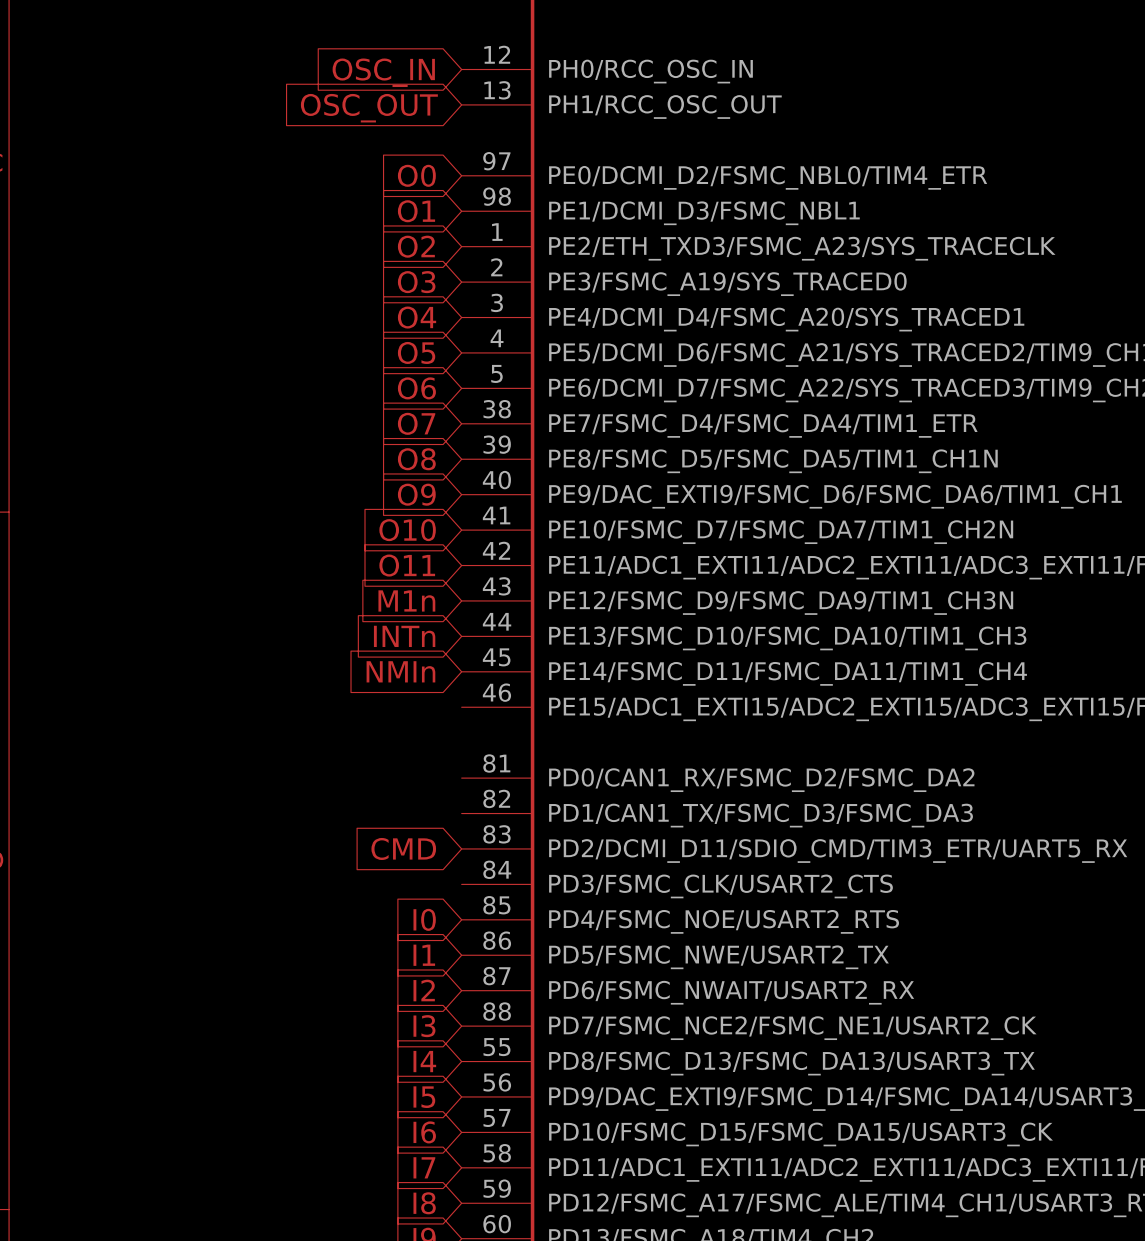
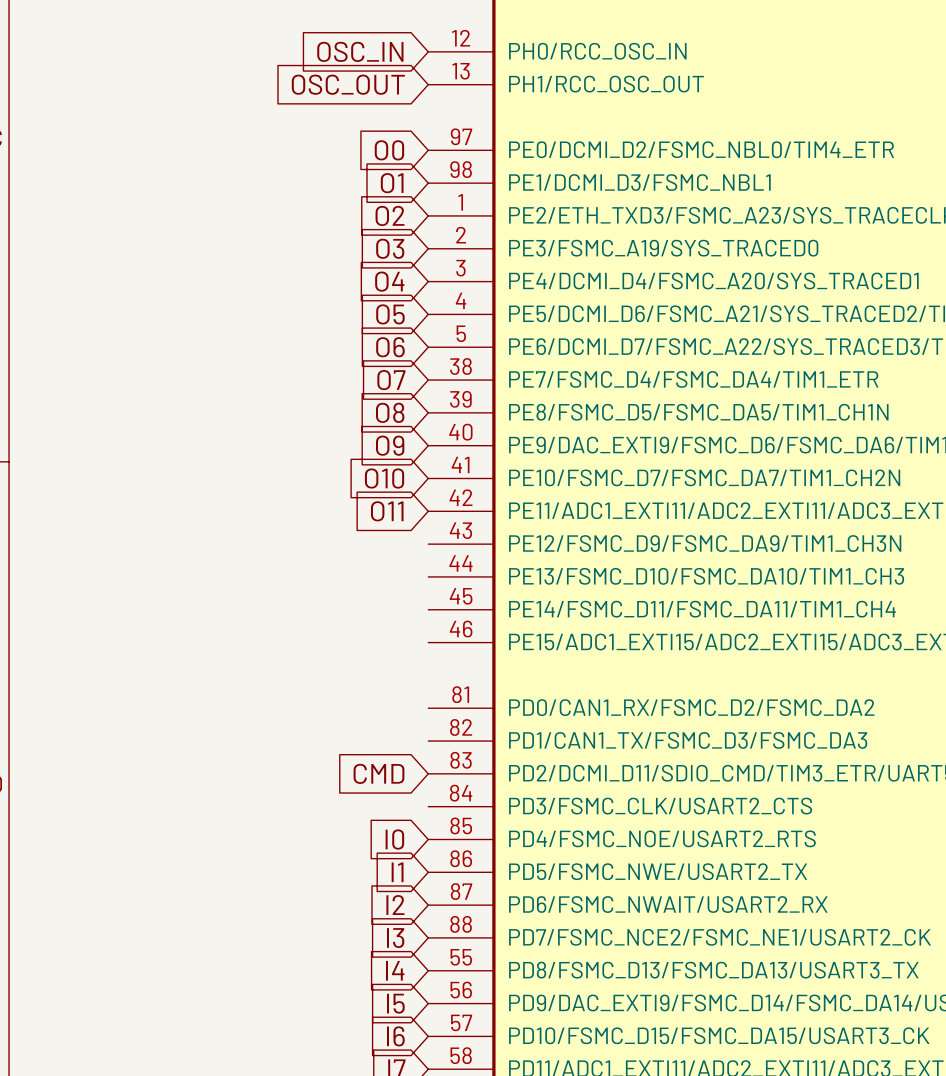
global label: M1n (406, 600) -> none
global label: INTn (404, 636) -> none
global label: NMIn (400, 671) -> none

